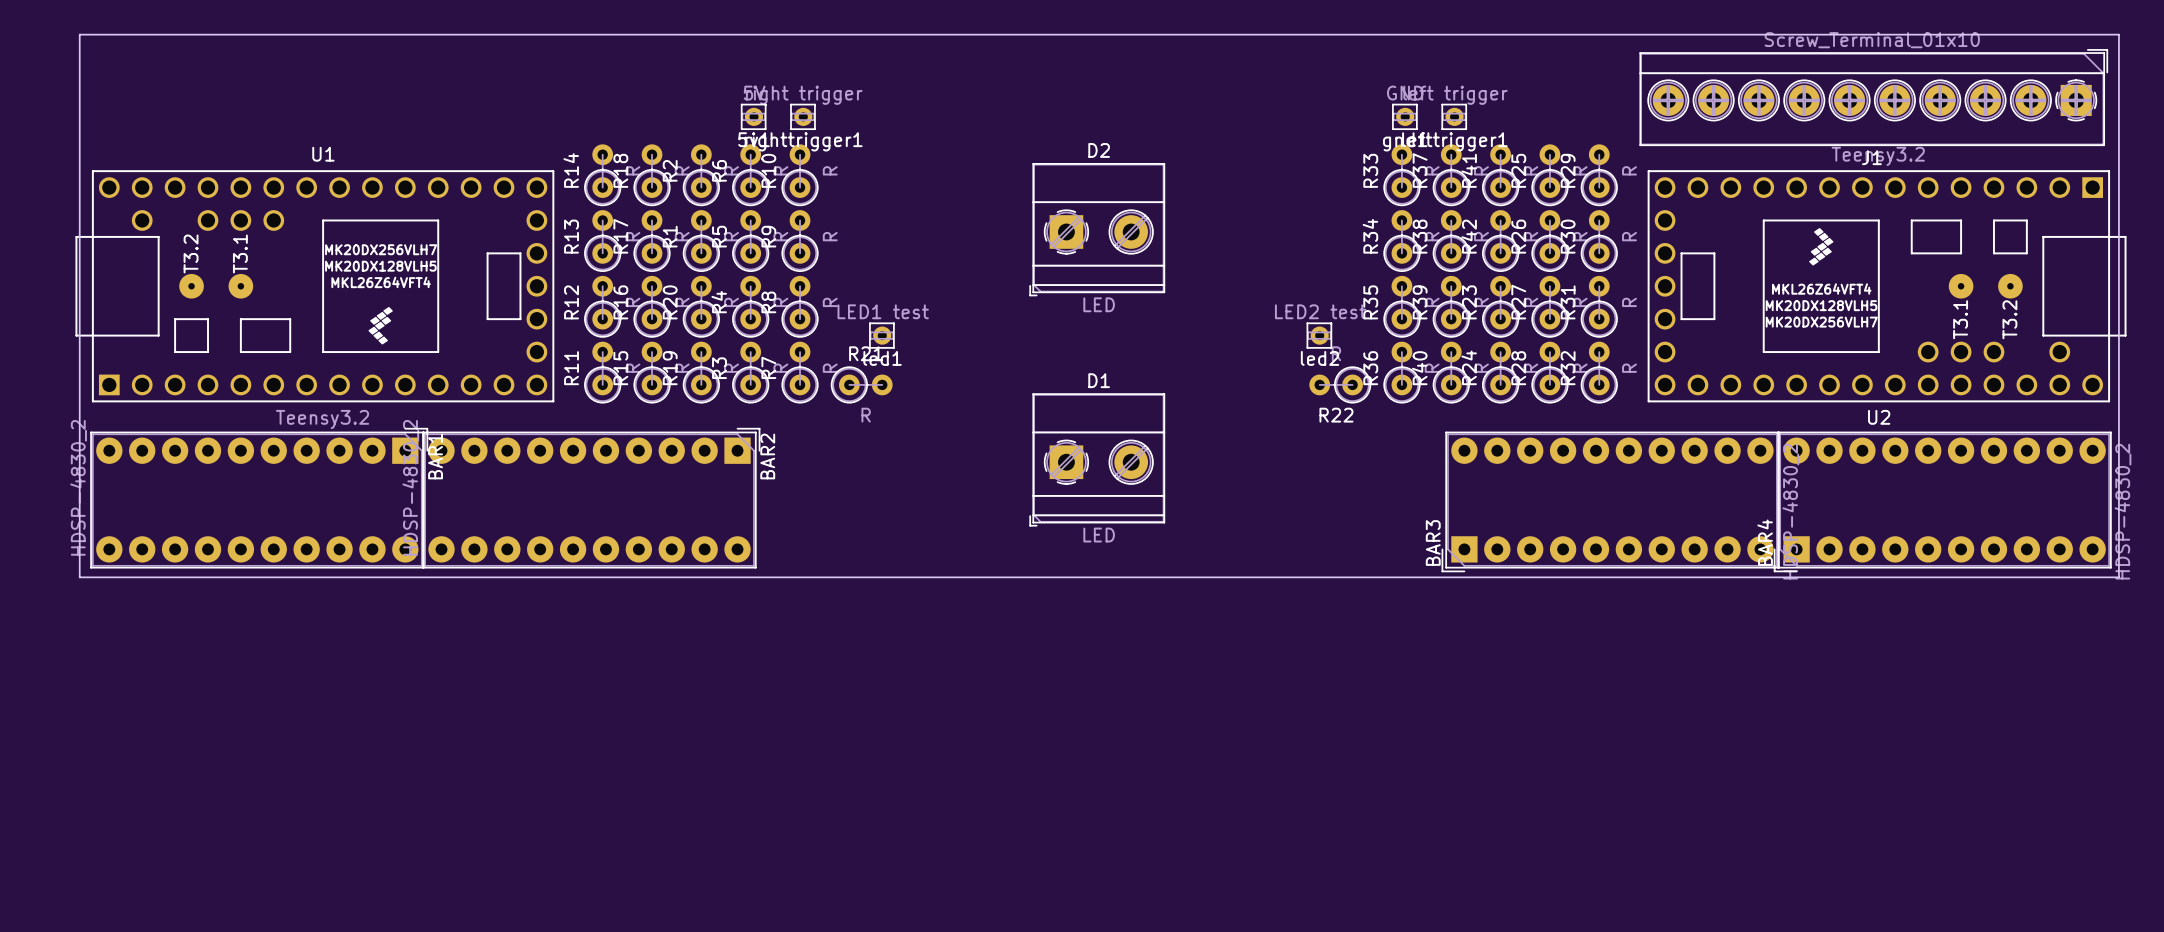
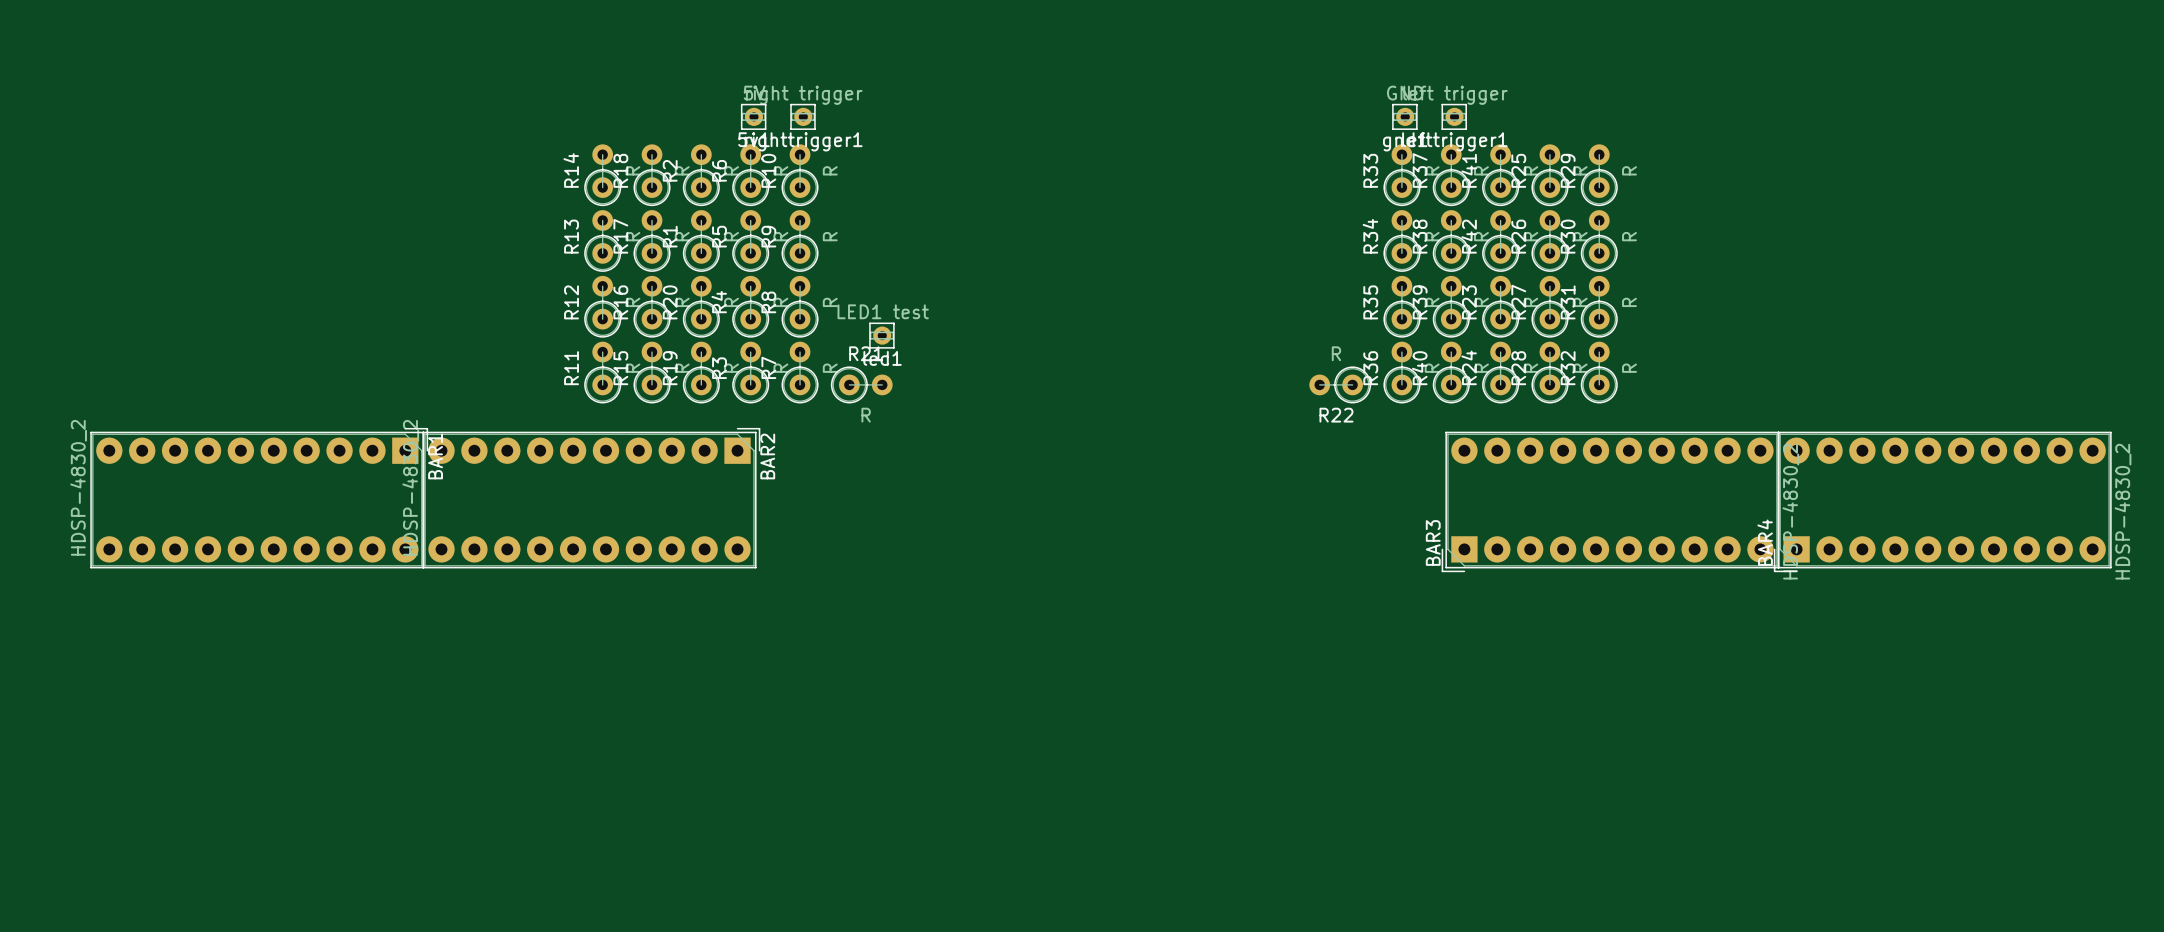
board edge: (79, 34) (79, 577) (2118, 577) (2118, 34) (79, 34) -> none
J1: Screw_Terminal_01x10 (1873, 97) -> none
D2: LED (1097, 229) -> none
U1: Teensy3.2 (314, 286) -> none
U2: Teensy3.2 (1887, 286) -> none
led2: LED2 test (1319, 335) -> none
D1: LED (1097, 459) -> none

